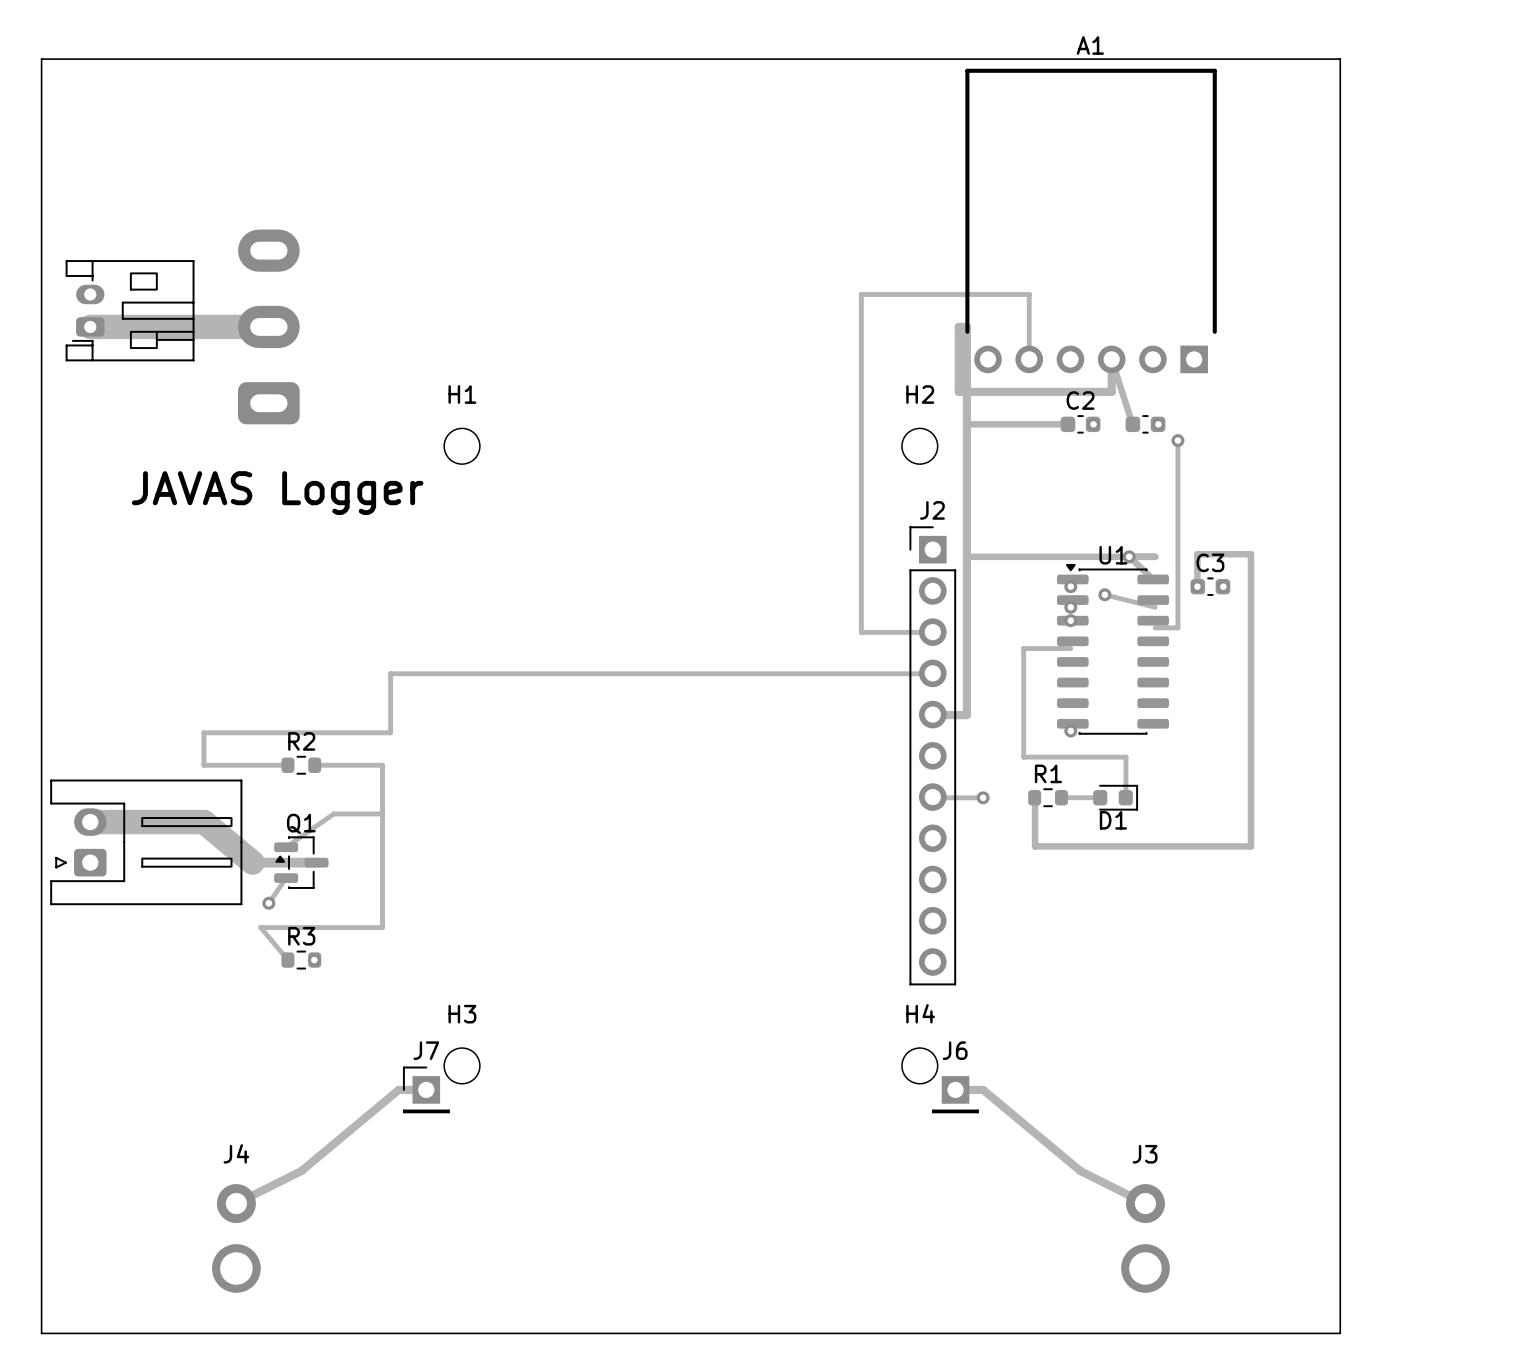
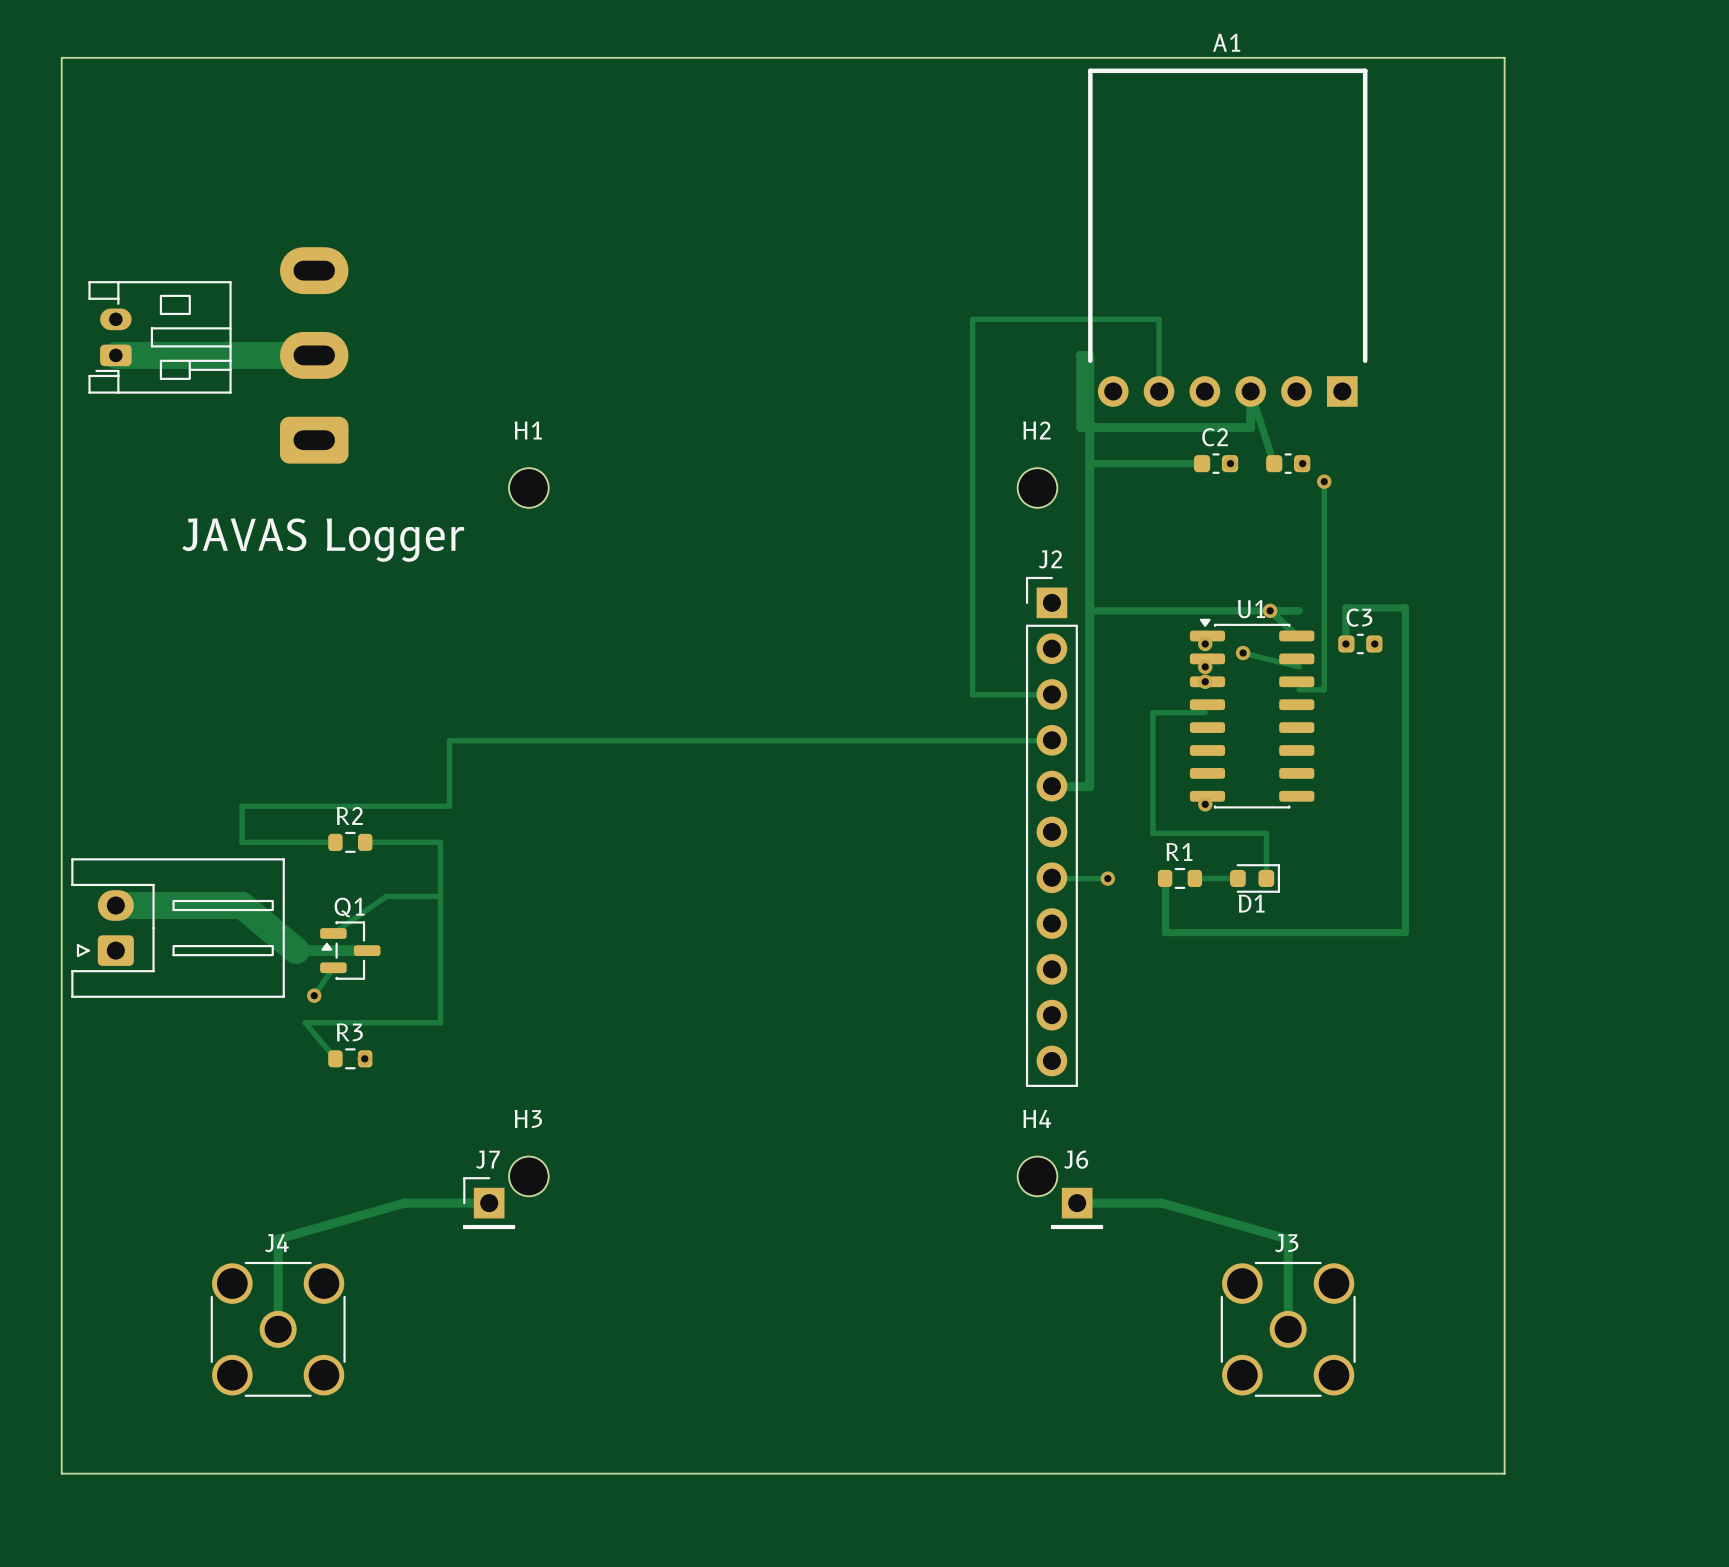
track: (398, 1089) (301, 1171) (236, 1203) -> (458, 1203) (404, 1203) (278, 1239) (278, 1329)
track: (983, 1089) (1080, 1171) (1145, 1203) -> (1107, 1203) (1161, 1203) (1288, 1239) (1288, 1329)
J4 footprint: [212, 1184, 261, 1293] -> [210, 1261, 346, 1397]
J3 footprint: [1121, 1184, 1170, 1293] -> [1220, 1261, 1356, 1397]

